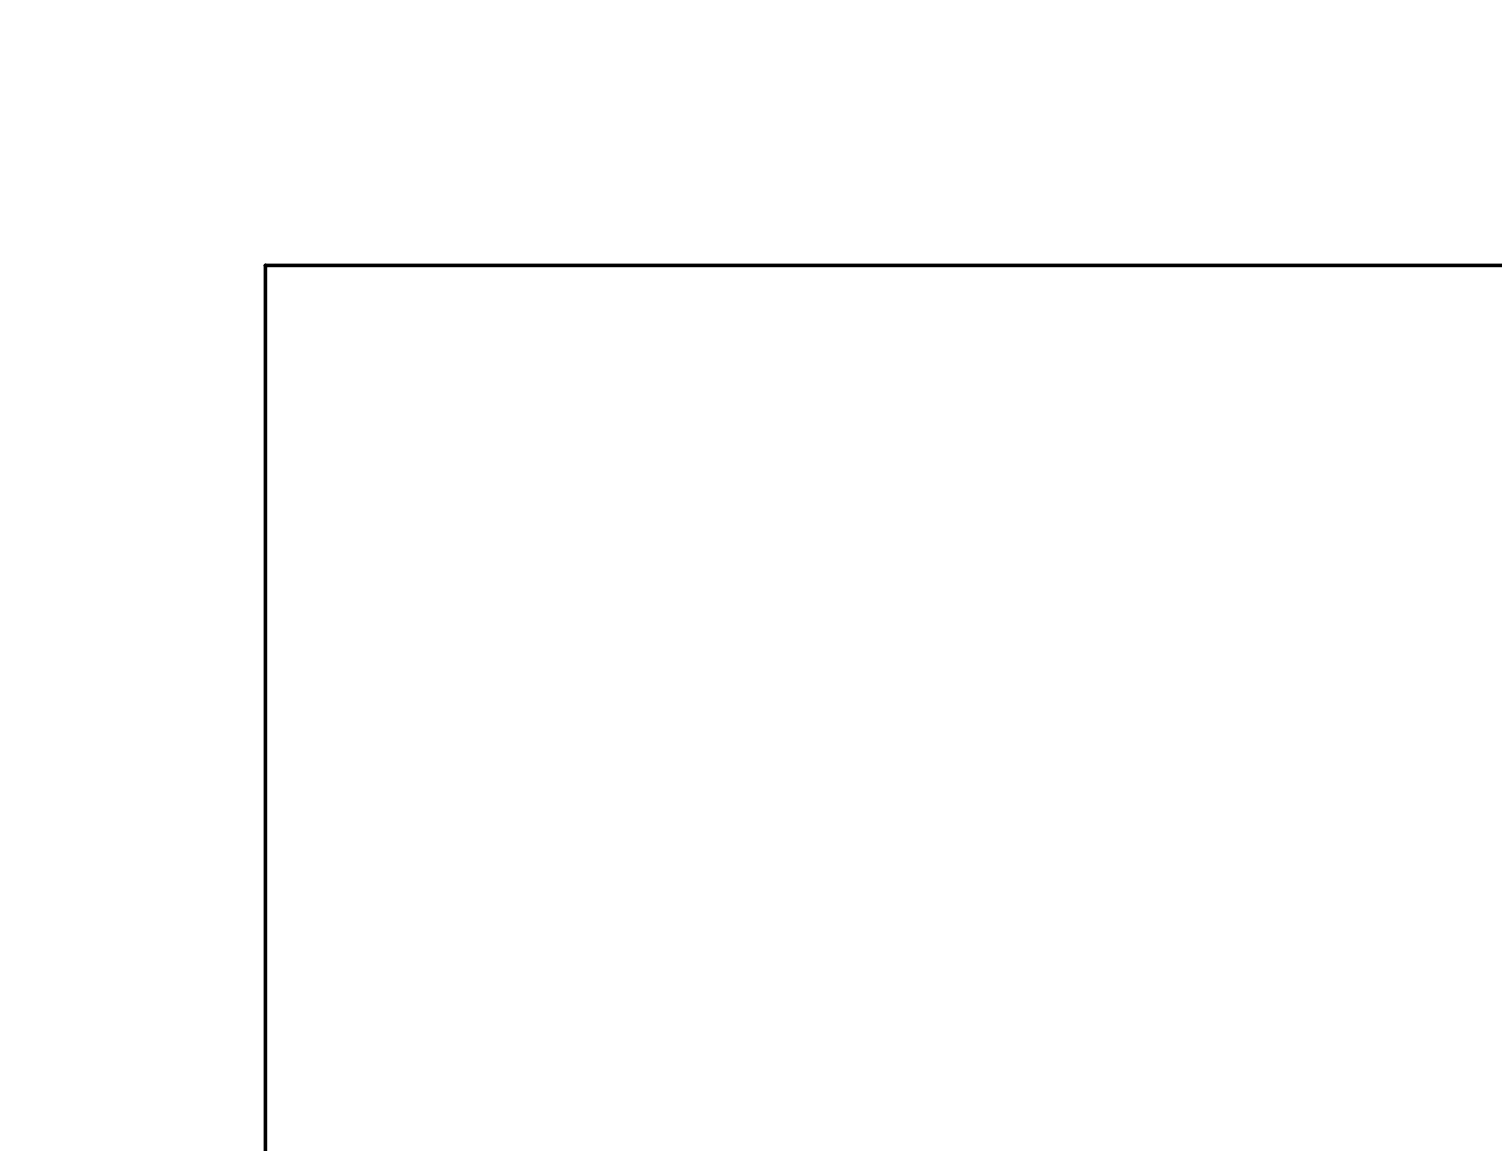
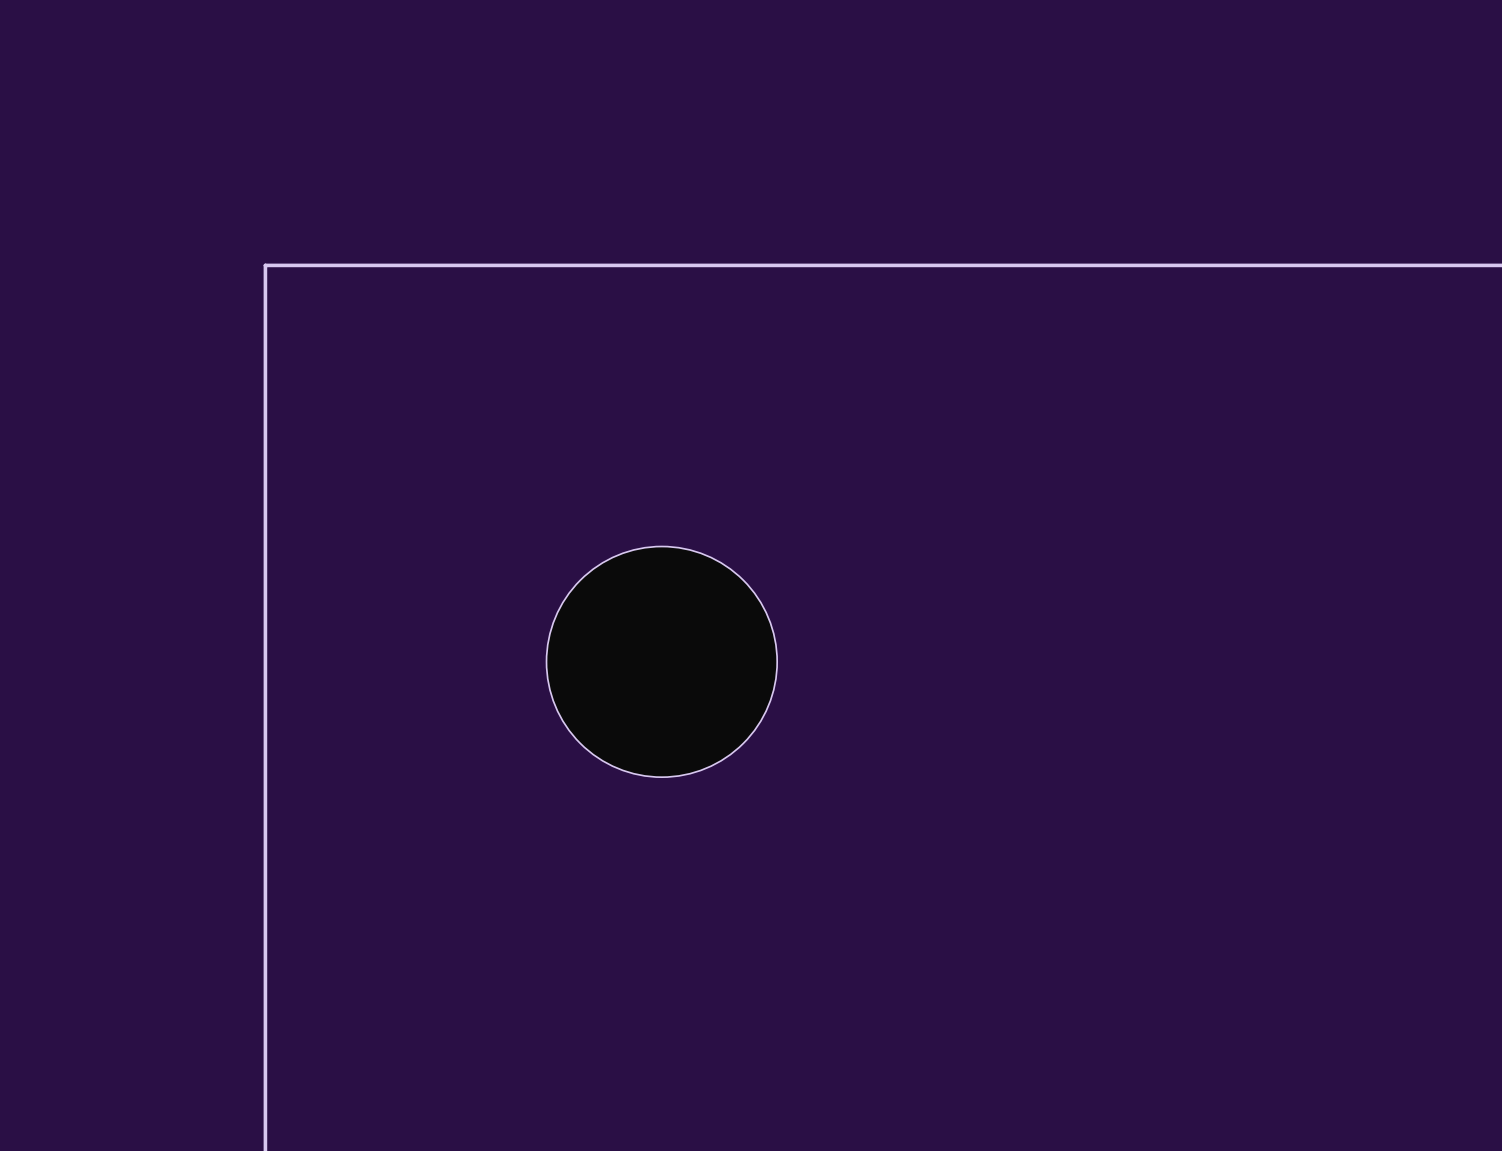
part: none -> (661, 661)

